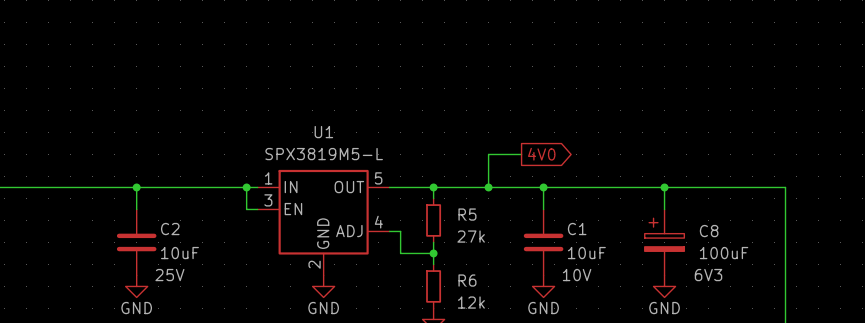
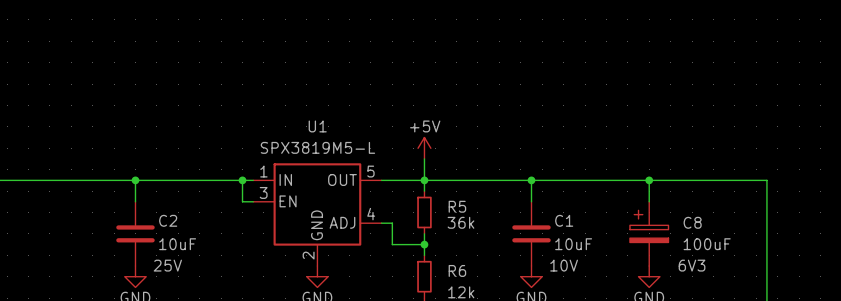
power symbol: none -> +5V (424, 148)
wire: (521, 154) (488, 154) (488, 187) -> none
global label: 4V0 (541, 154) -> none
wire: none -> (424, 158) (424, 180)
junction: (488, 187) -> none
R5 value: 27k (471, 236) -> 36k (460, 222)

